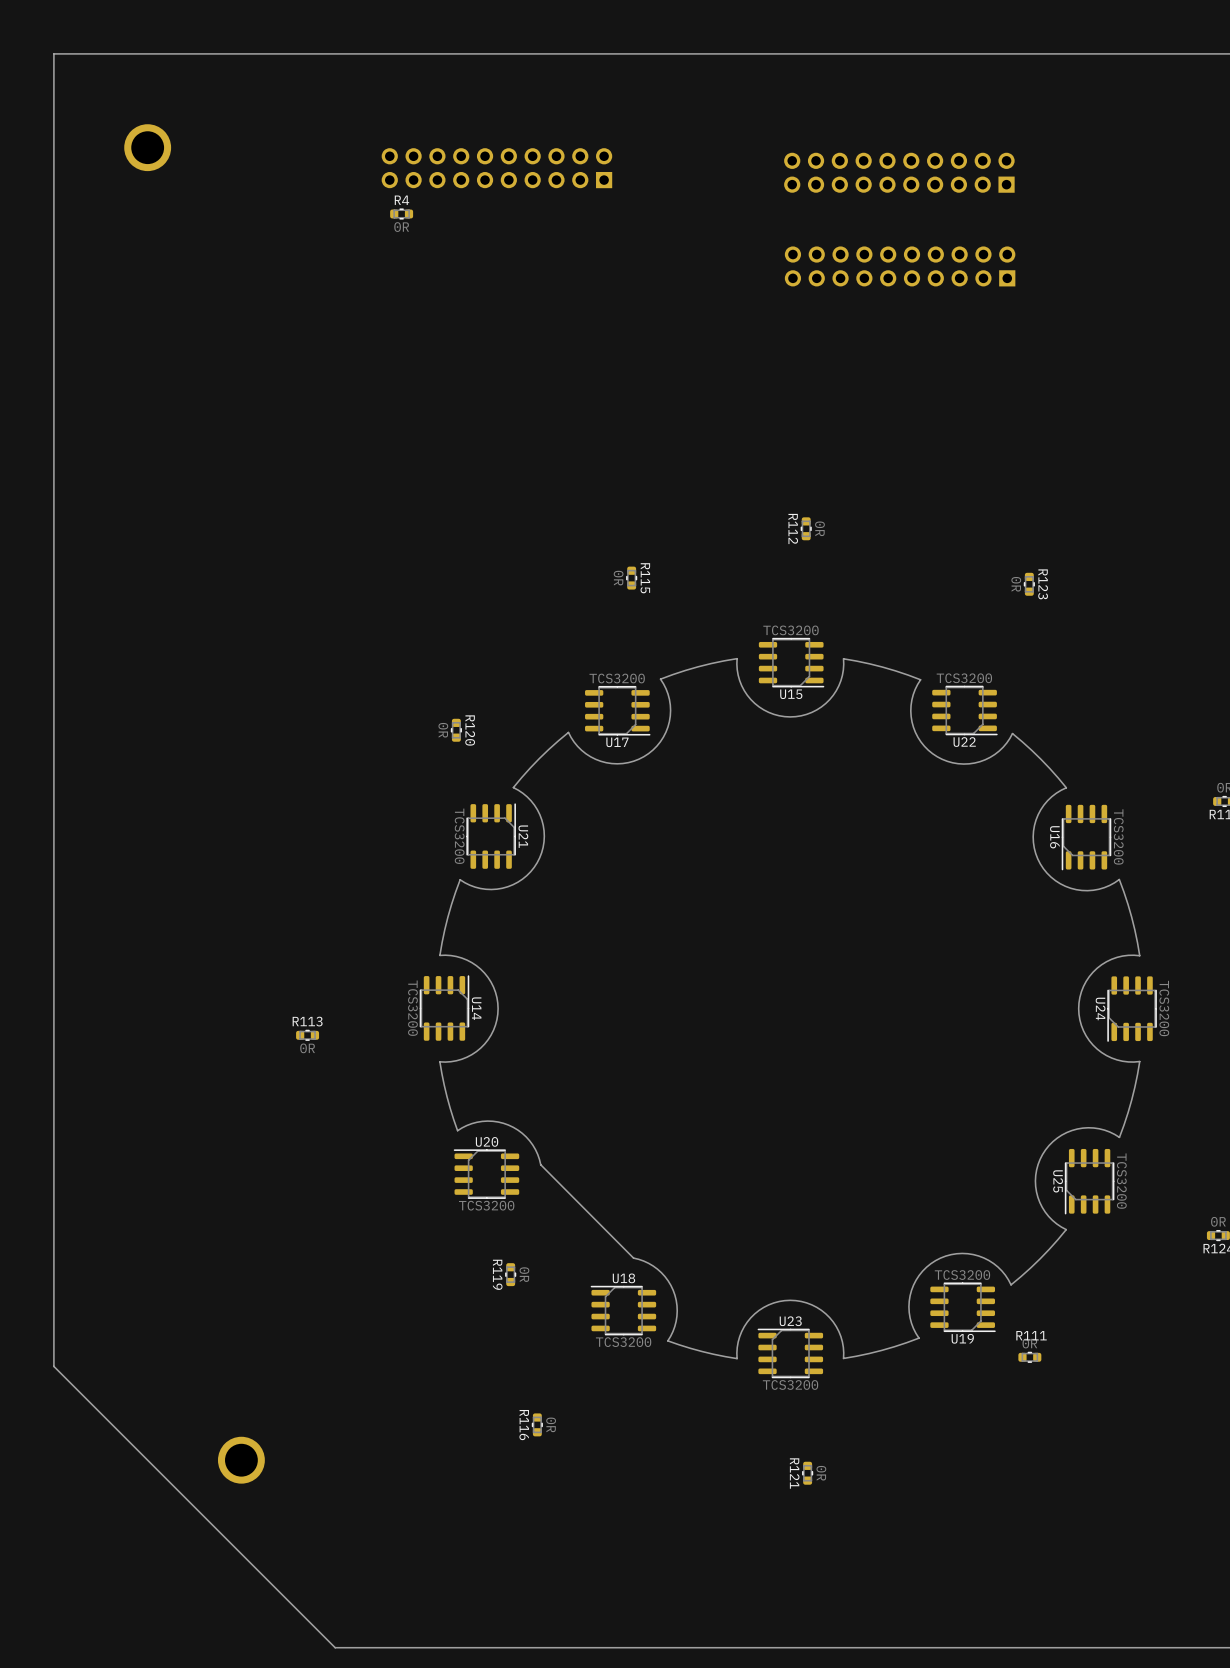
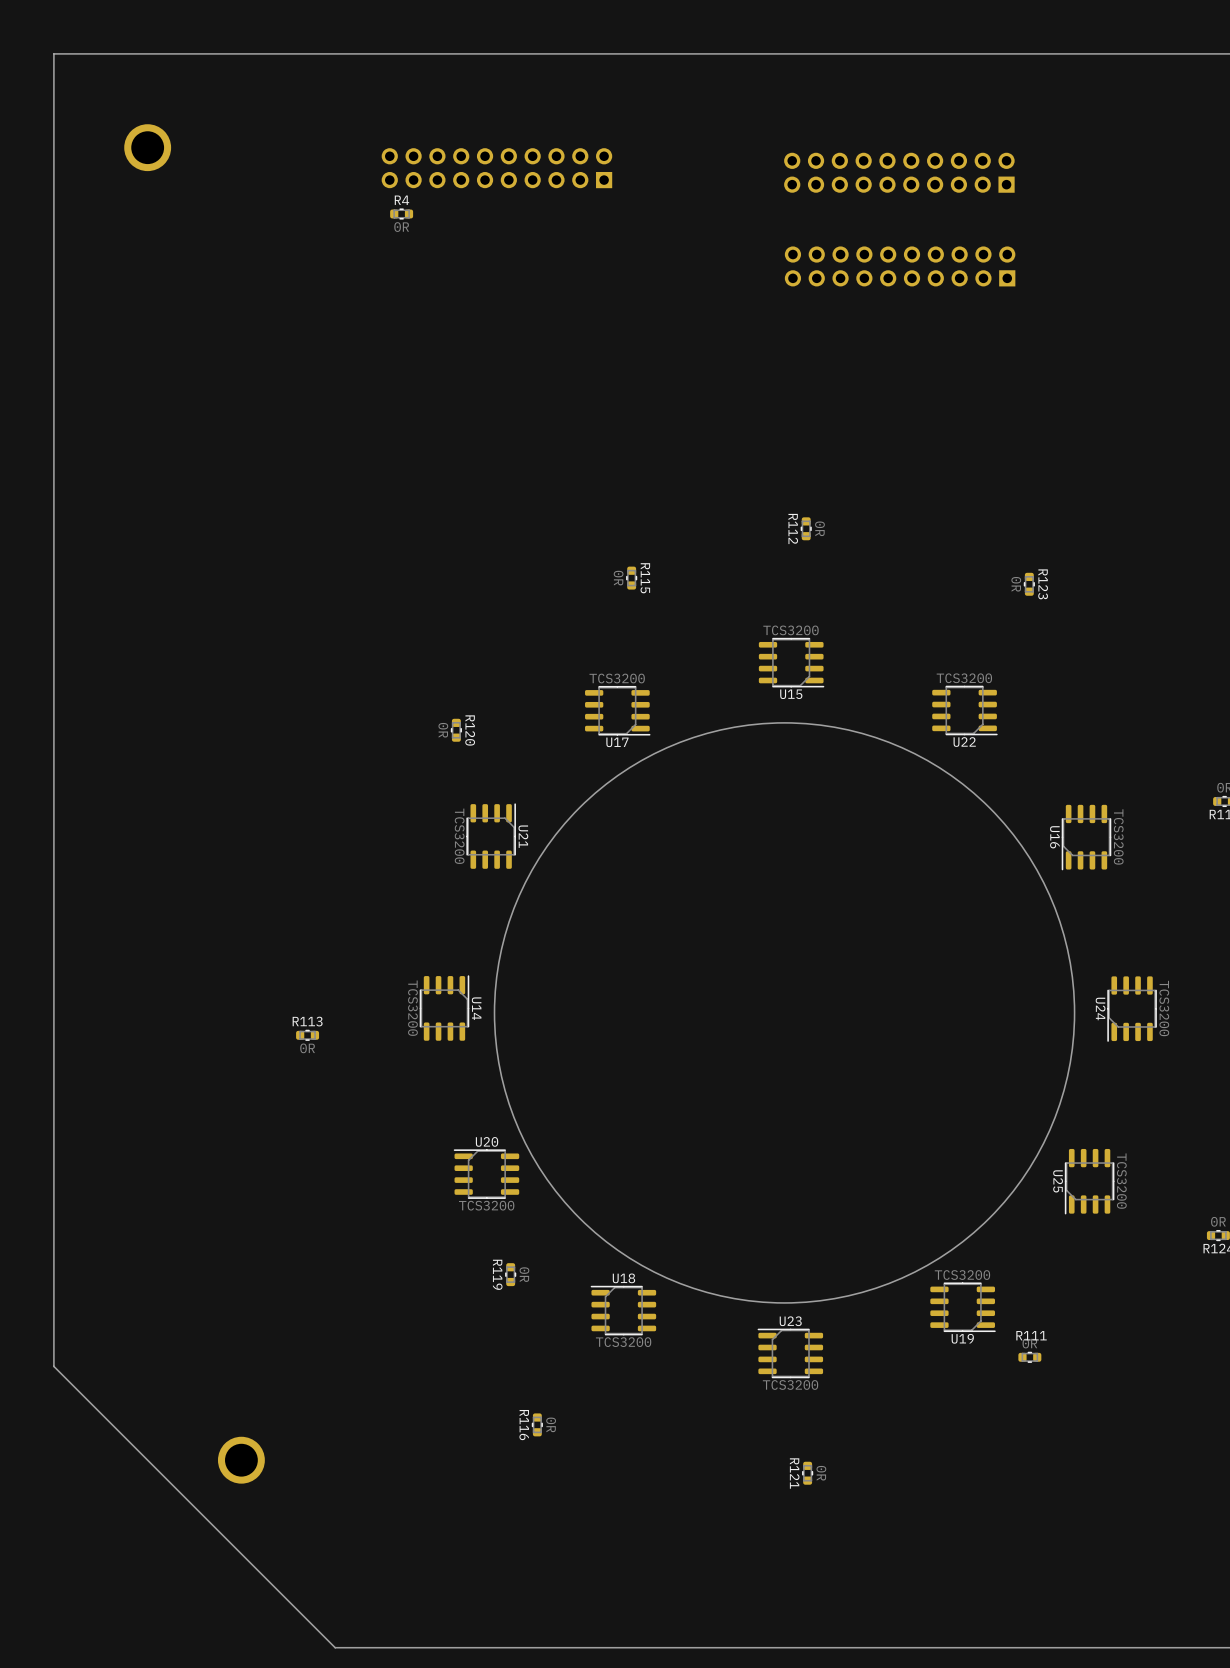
board edge: (737, 658) (698, 666) (660, 679) (669, 699) (669, 721) (660, 741) (643, 756) (622, 763) (600, 761) (581, 750) (568, 732) (539, 758) (513, 787) (531, 800) (539, 814) (544, 836) (539, 857) (526, 875) (507, 886) (496, 889) (480, 888) (460, 879) (447, 917) (439, 955) (461, 958) (471, 962) (484, 973) (491, 982) (496, 997) (497, 1014) (495, 1025) (484, 1044) (471, 1054) (456, 1060) (439, 1061) (447, 1096) (457, 1130) (471, 1123) (487, 1121) (503, 1123) (517, 1130) (532, 1145) (540, 1164) (633, 1258) (648, 1263) (664, 1276) (673, 1290) (677, 1310) (674, 1326) (667, 1340) (702, 1351) (737, 1358) (739, 1336) (744, 1326) (754, 1313) (773, 1302) (795, 1300) (816, 1307) (833, 1321) (840, 1336) (843, 1358) (881, 1350) (919, 1338) (910, 1317) (910, 1295) (919, 1275) (935, 1260) (956, 1253) (978, 1256) (997, 1267) (1011, 1284) (1040, 1258) (1066, 1229) (1052, 1220) (1039, 1202) (1035, 1180) (1040, 1159) (1052, 1141) (1066, 1132) (1077, 1129) (1099, 1128) (1119, 1137) (1131, 1100) (1139, 1061) (1128, 1061) (1111, 1058) (1093, 1045) (1086, 1035) (1079, 1020) (1079, 997) (1086, 981) (1101, 964) (1122, 956) (1139, 955) (1131, 917) (1119, 879) (1098, 889) (1076, 889) (1055, 880) (1040, 863) (1033, 842) (1036, 819) (1047, 800) (1066, 787) (1040, 759) (1012, 733) (1003, 747) (985, 759) (963, 764) (942, 759) (928, 750) (920, 741) (912, 721) (911, 699) (920, 679) (882, 667) (843, 658) (842, 675) (838, 685) (833, 695) (821, 706) (811, 712) (795, 716) (773, 714) (754, 703) (744, 690) (738, 675) (737, 658) -> none
round board edge: none -> [494, 722, 1075, 1304]

